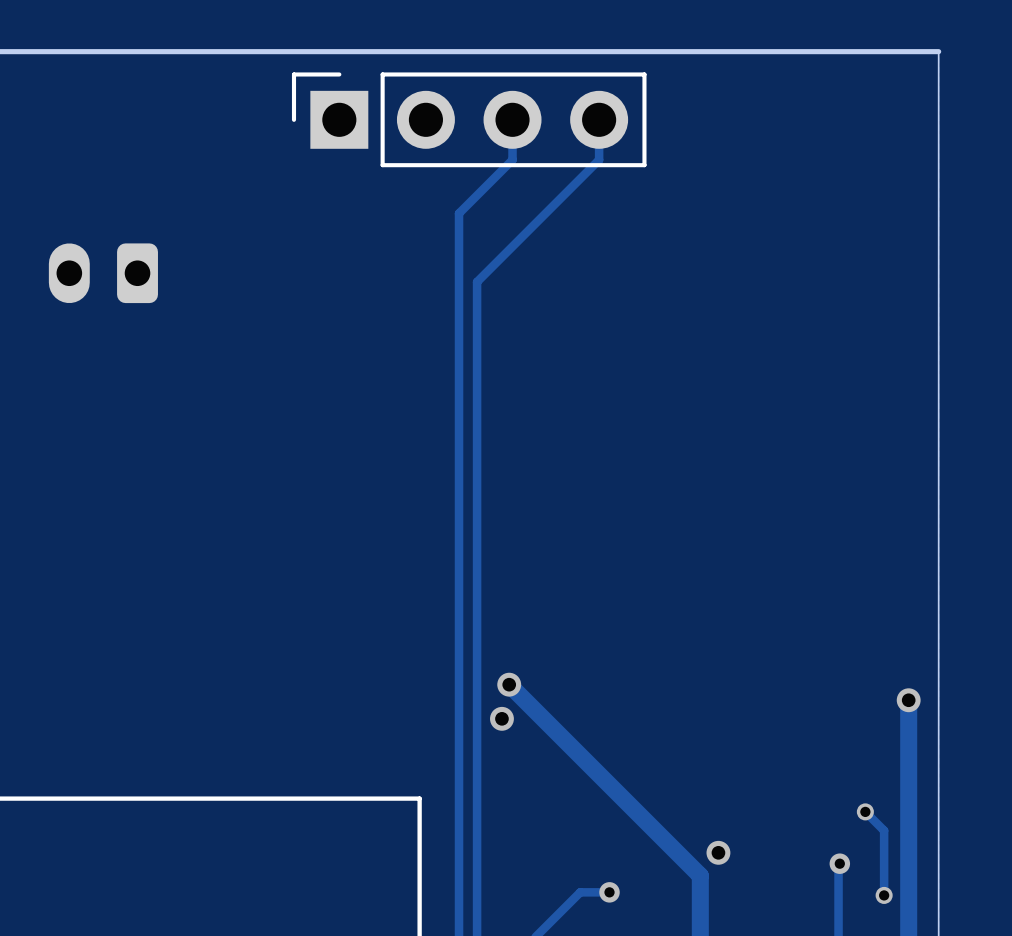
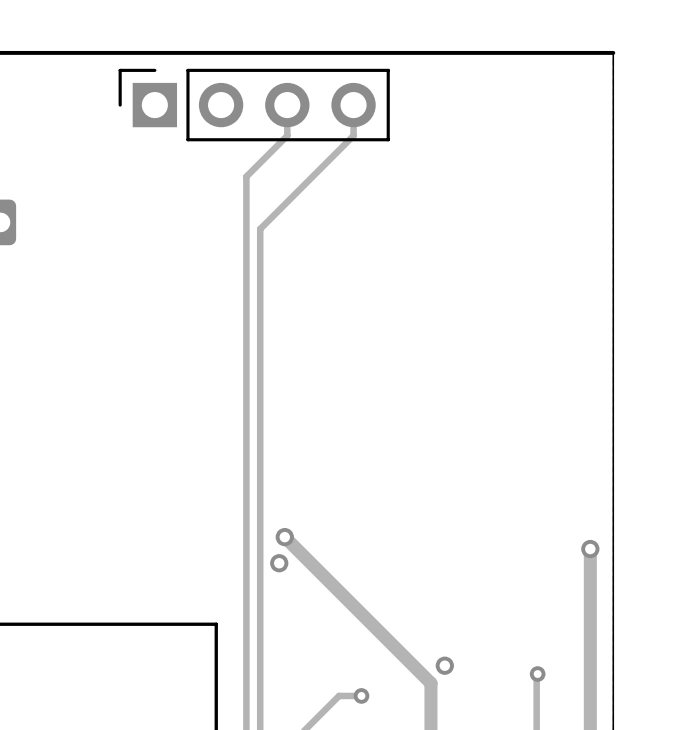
track: (865, 811) (884, 830) (884, 895) -> none
via: (865, 811) -> none
via: (884, 895) -> none

